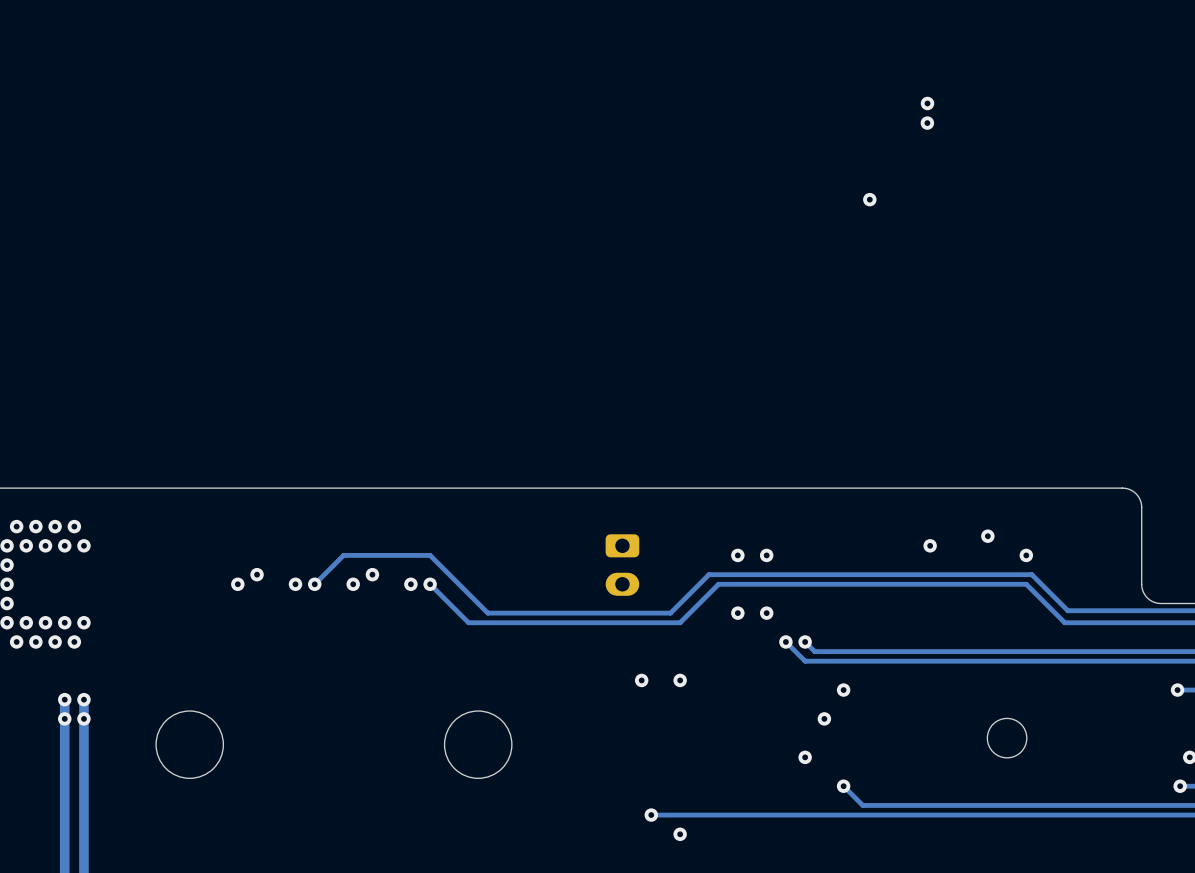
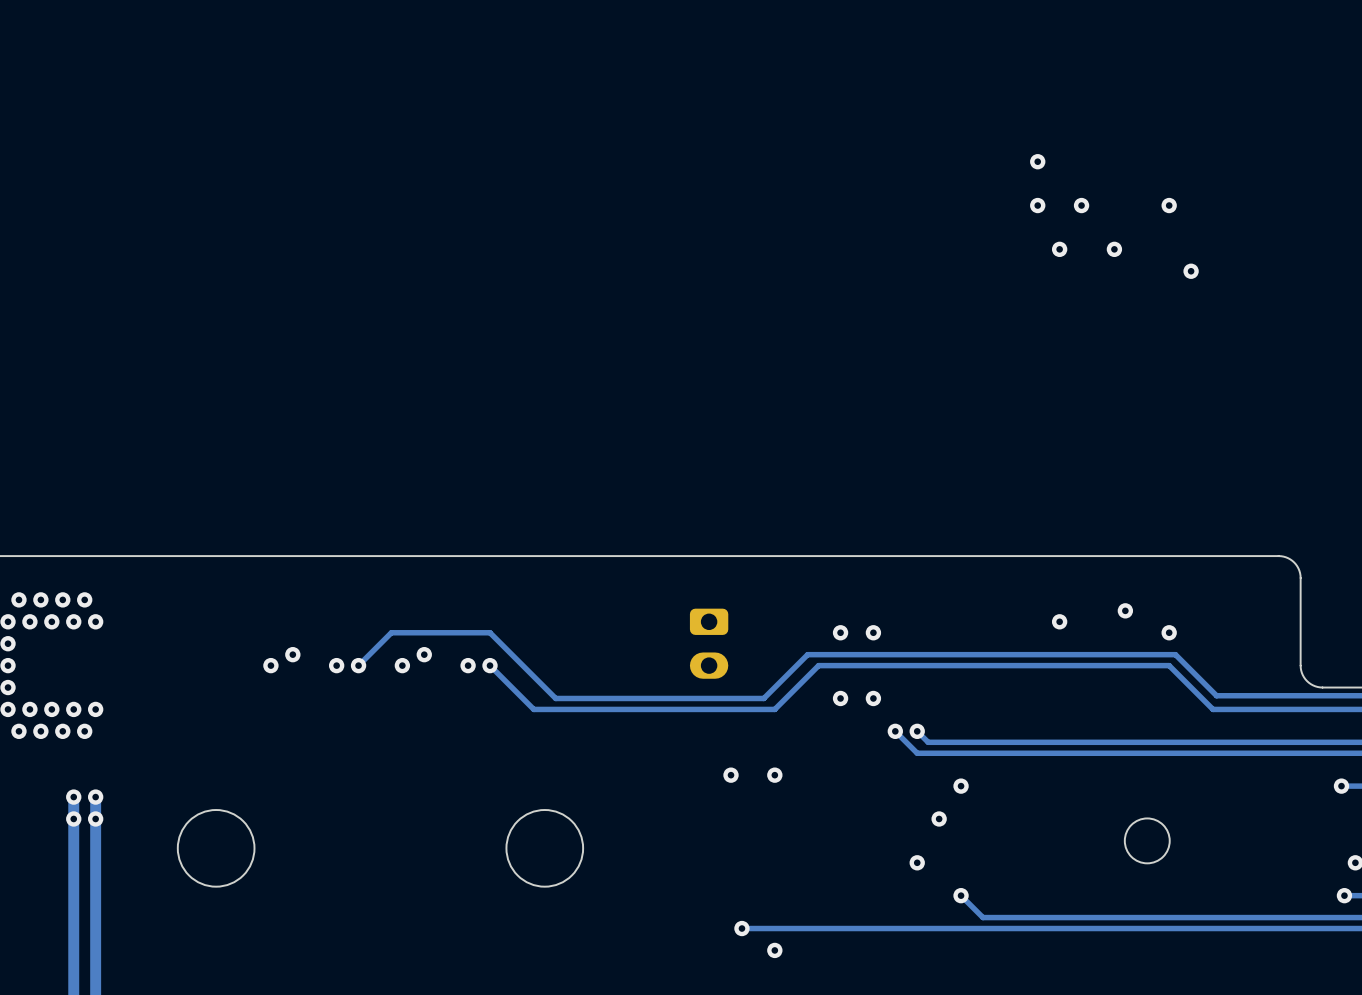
via: (927, 103) -> none
via: (927, 123) -> none
via: none -> (1037, 161)
via: none -> (1037, 205)
via: none -> (1081, 205)
via: none -> (1169, 205)
via: (869, 199) -> none
via: none -> (1059, 249)
via: none -> (1114, 249)
via: none -> (1191, 271)

